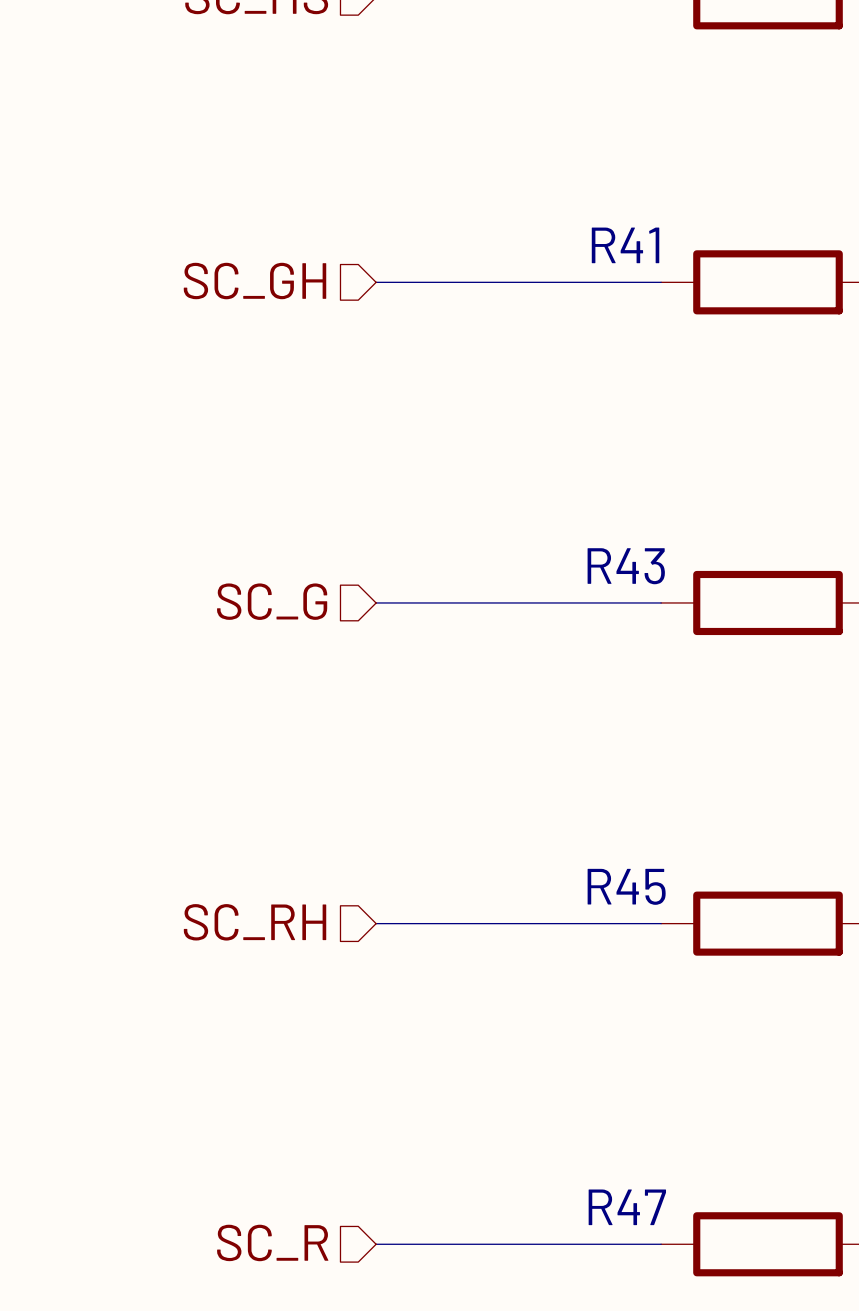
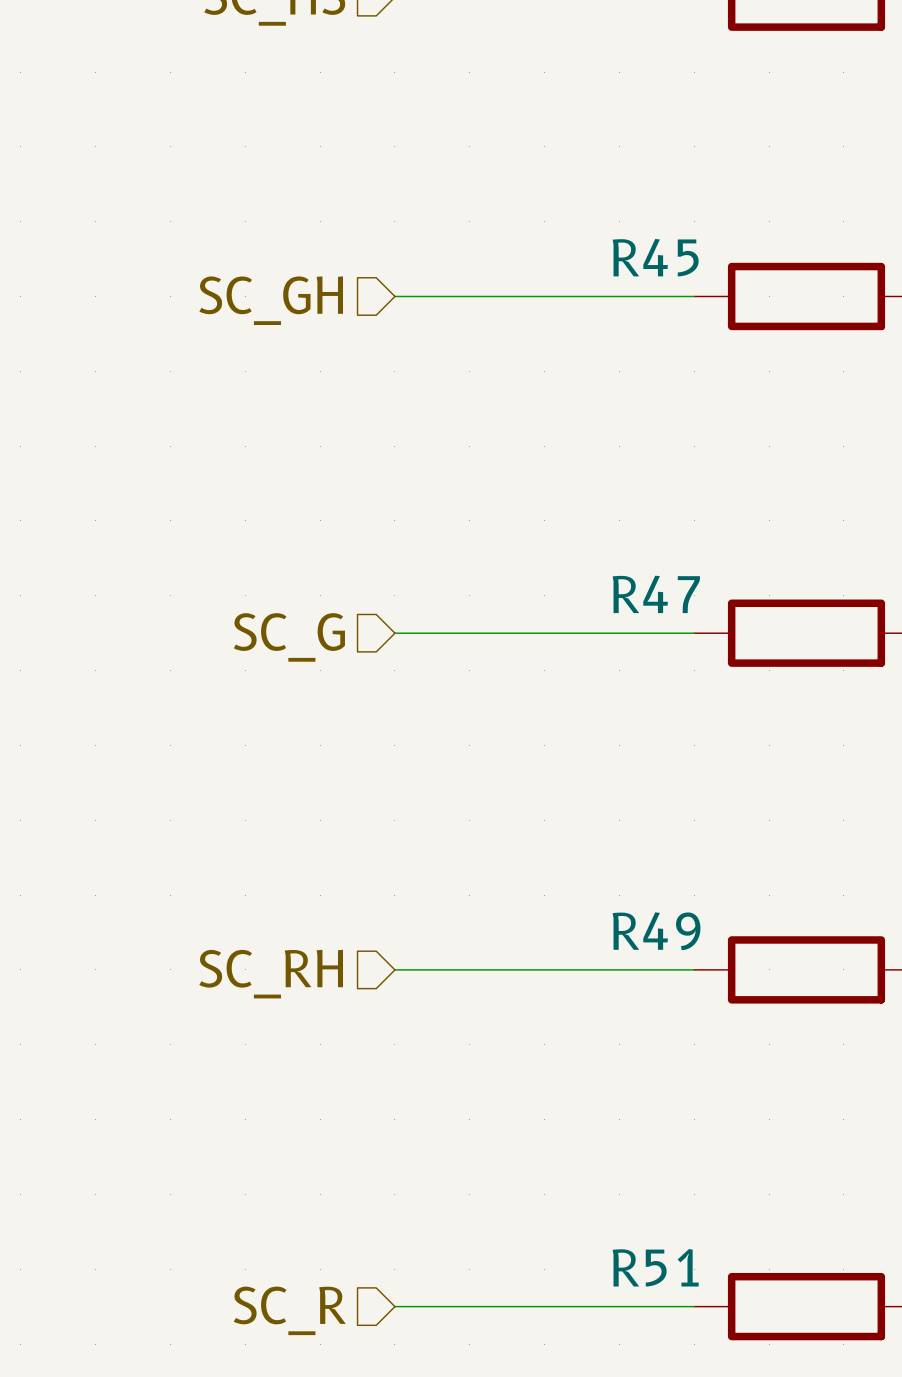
R41 name: R41 (625, 245) -> R45 (655, 257)
R43 name: R43 (626, 566) -> R47 (656, 594)
R45 name: R45 (626, 886) -> R49 (656, 931)
R47 name: R47 (627, 1207) -> R51 (655, 1267)

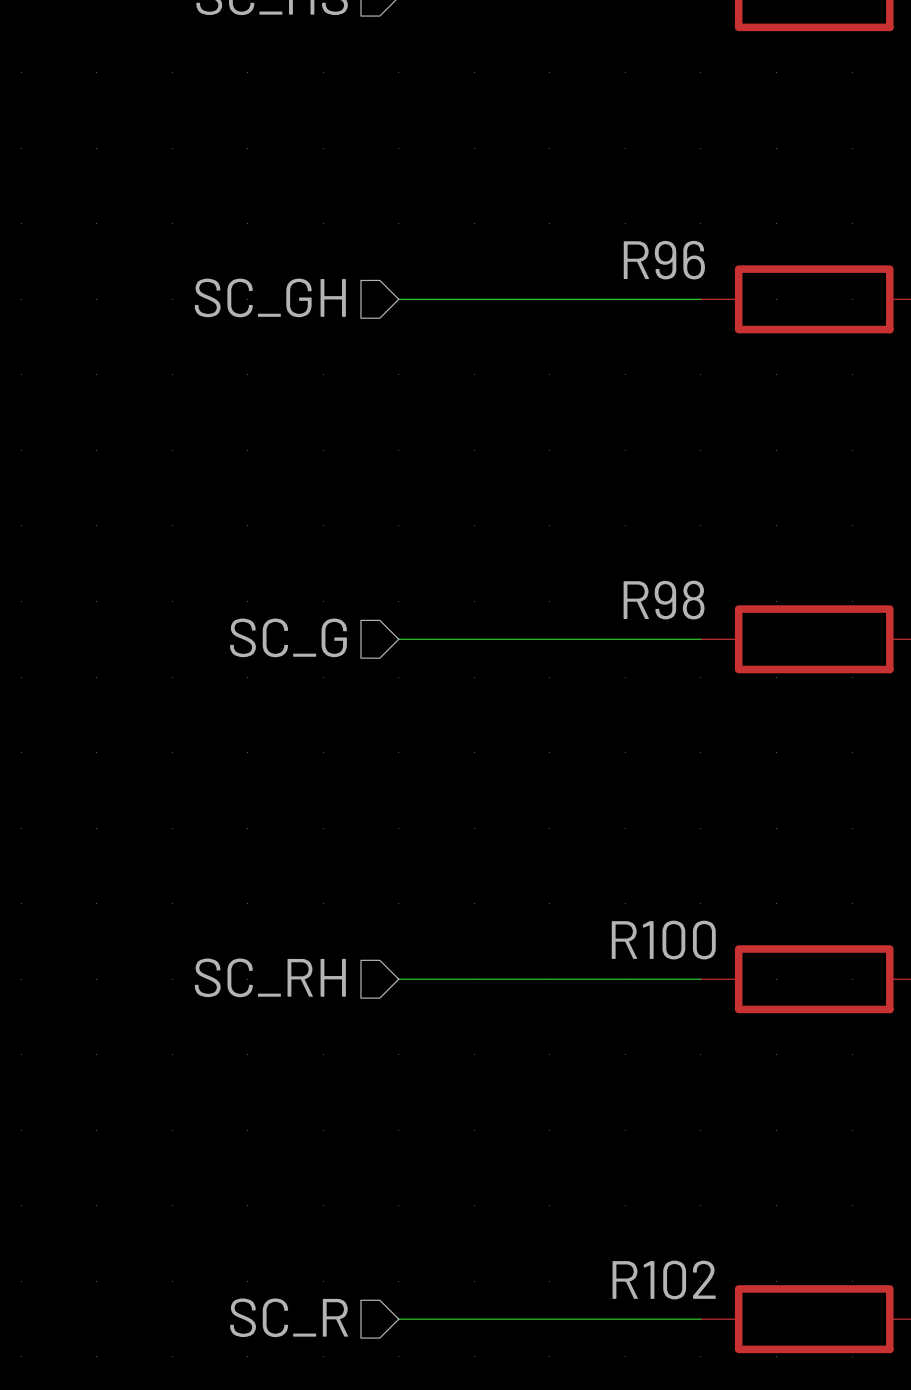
R45 name: R45 (655, 257) -> R96 (664, 260)
R47 name: R47 (656, 594) -> R98 (664, 600)
R49 name: R49 (656, 931) -> R100 (663, 940)
R51 name: R51 (655, 1267) -> R102 (664, 1280)

